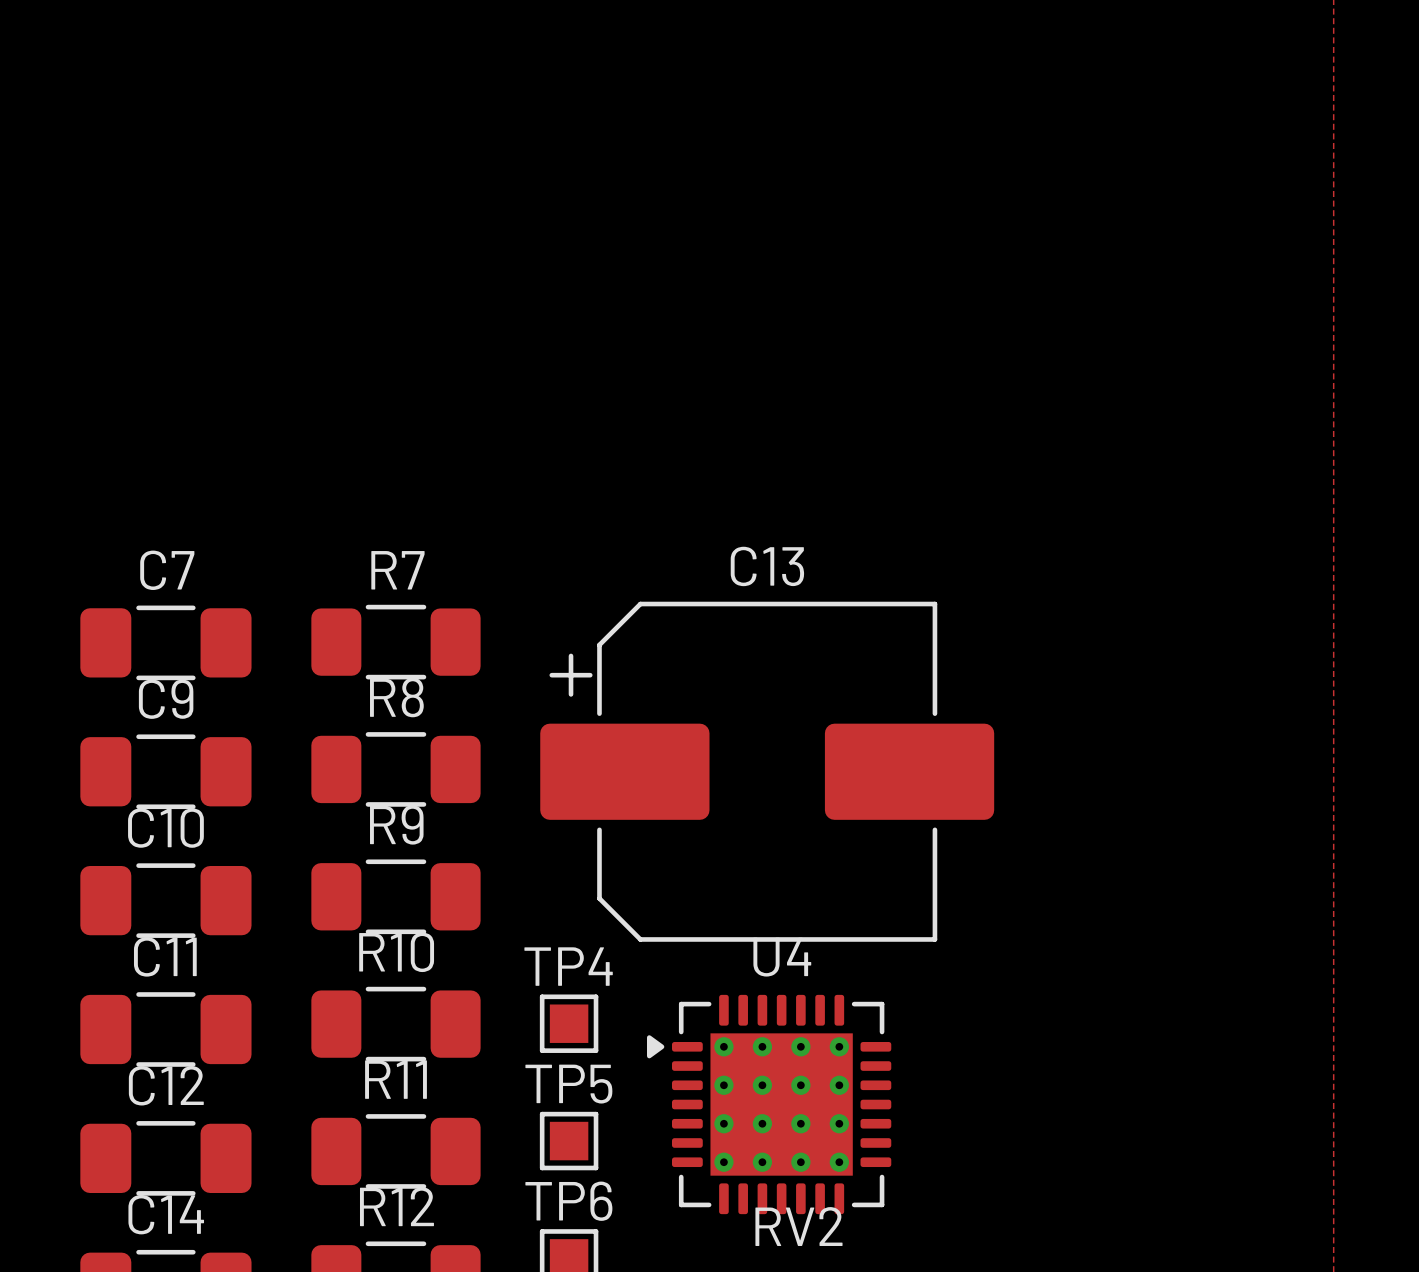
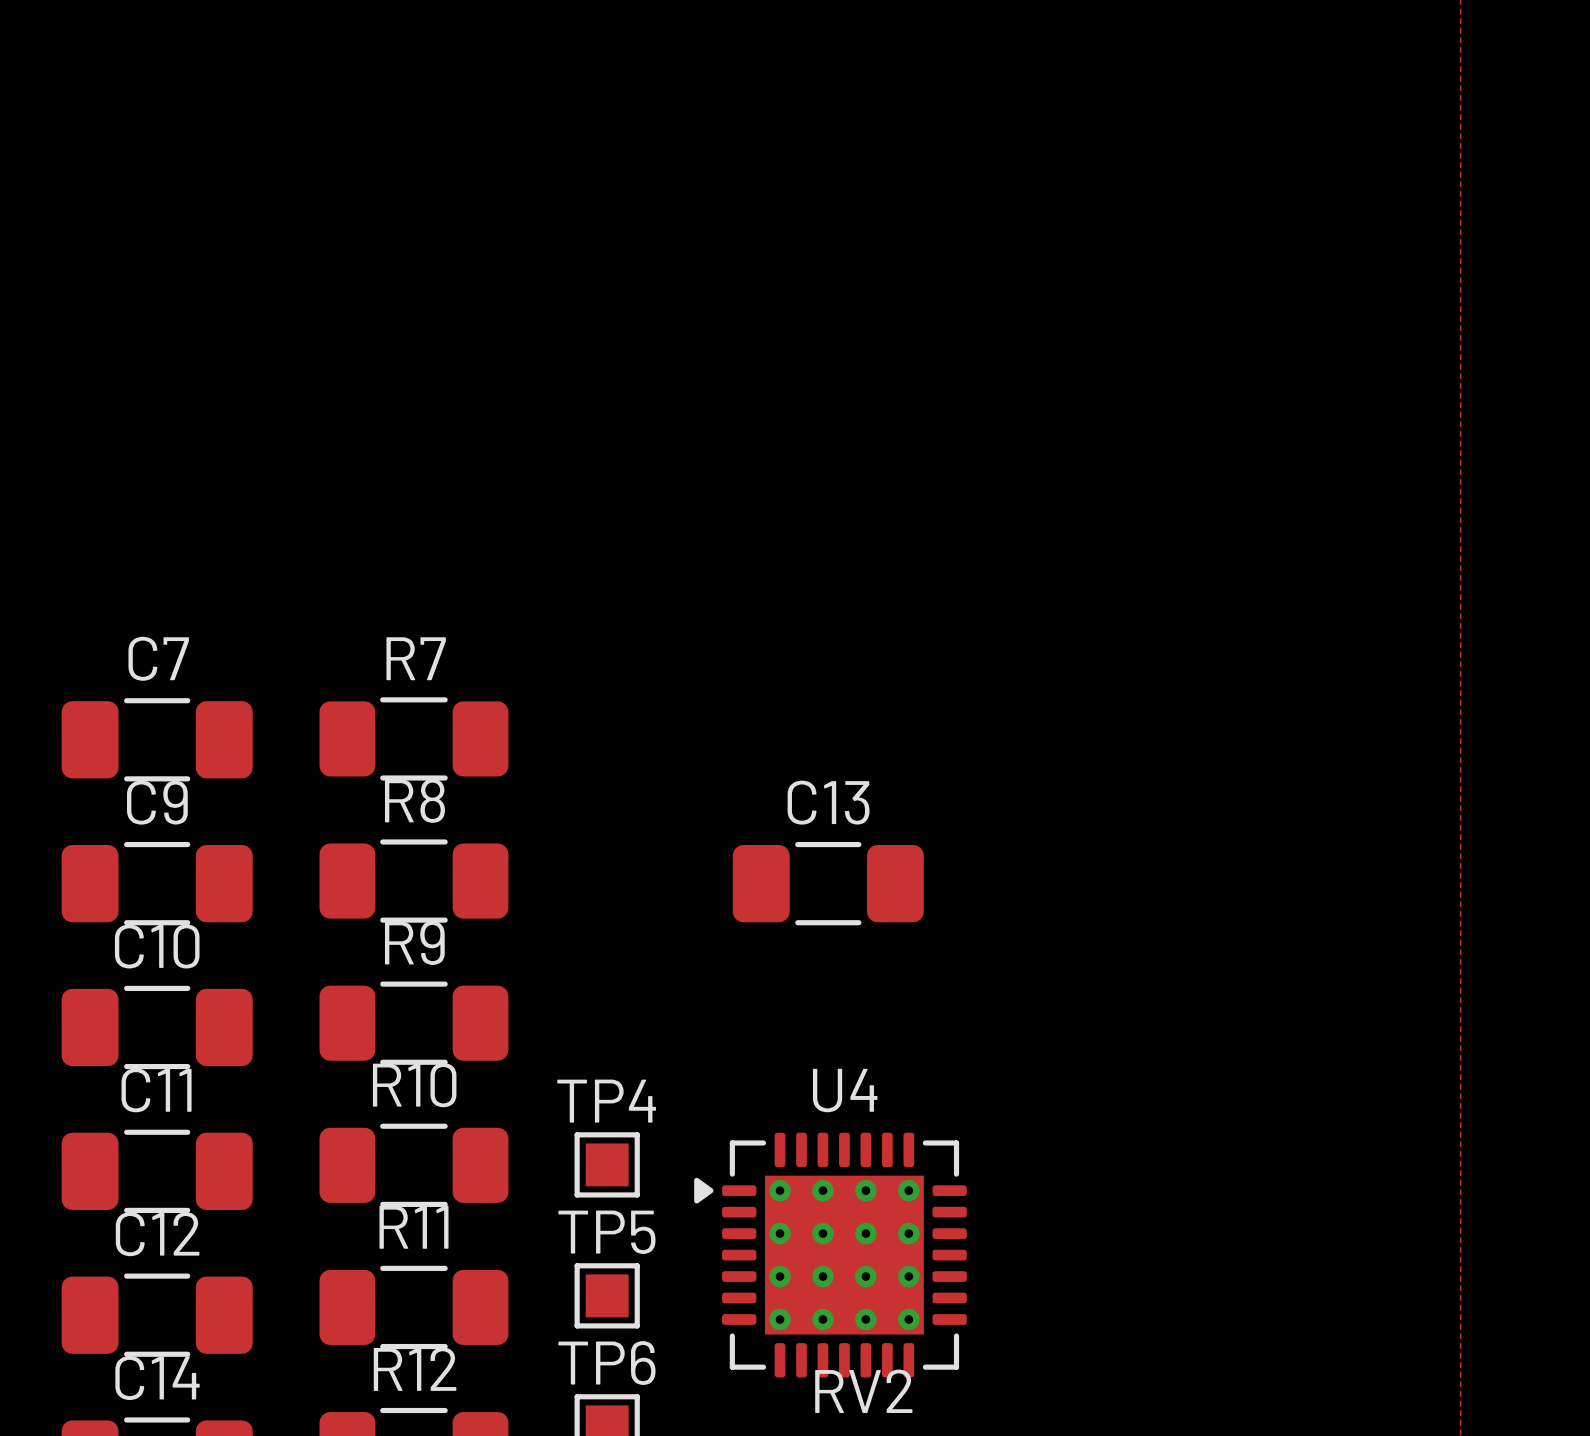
C13 name position: C13 (767, 566) -> C13 (828, 802)
C13 footprint: [540, 601, 995, 942] -> [732, 841, 924, 926]

